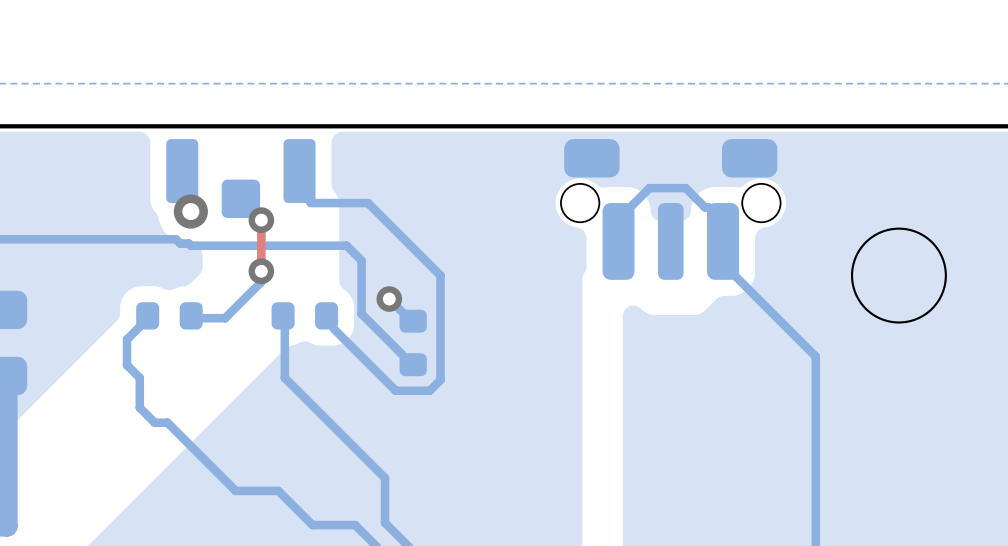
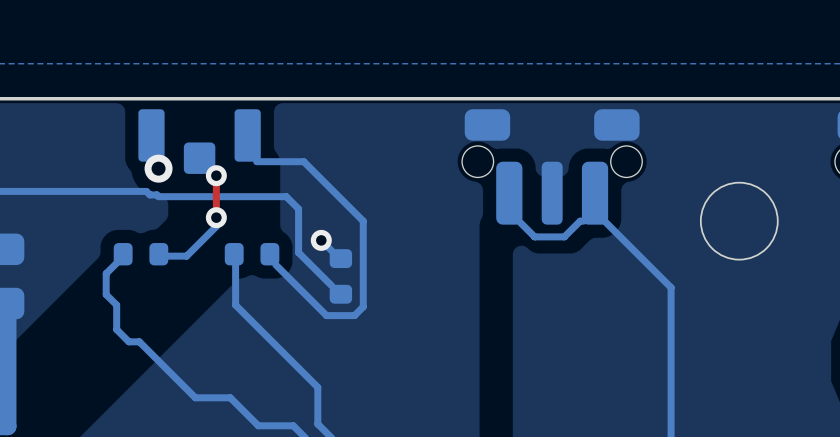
bottom track: (630, 207) (649, 188) (685, 188) (704, 207) (709, 207) -> none
bottom track: none -> (518, 221) (534, 236) (564, 236) (580, 221) (583, 221)

